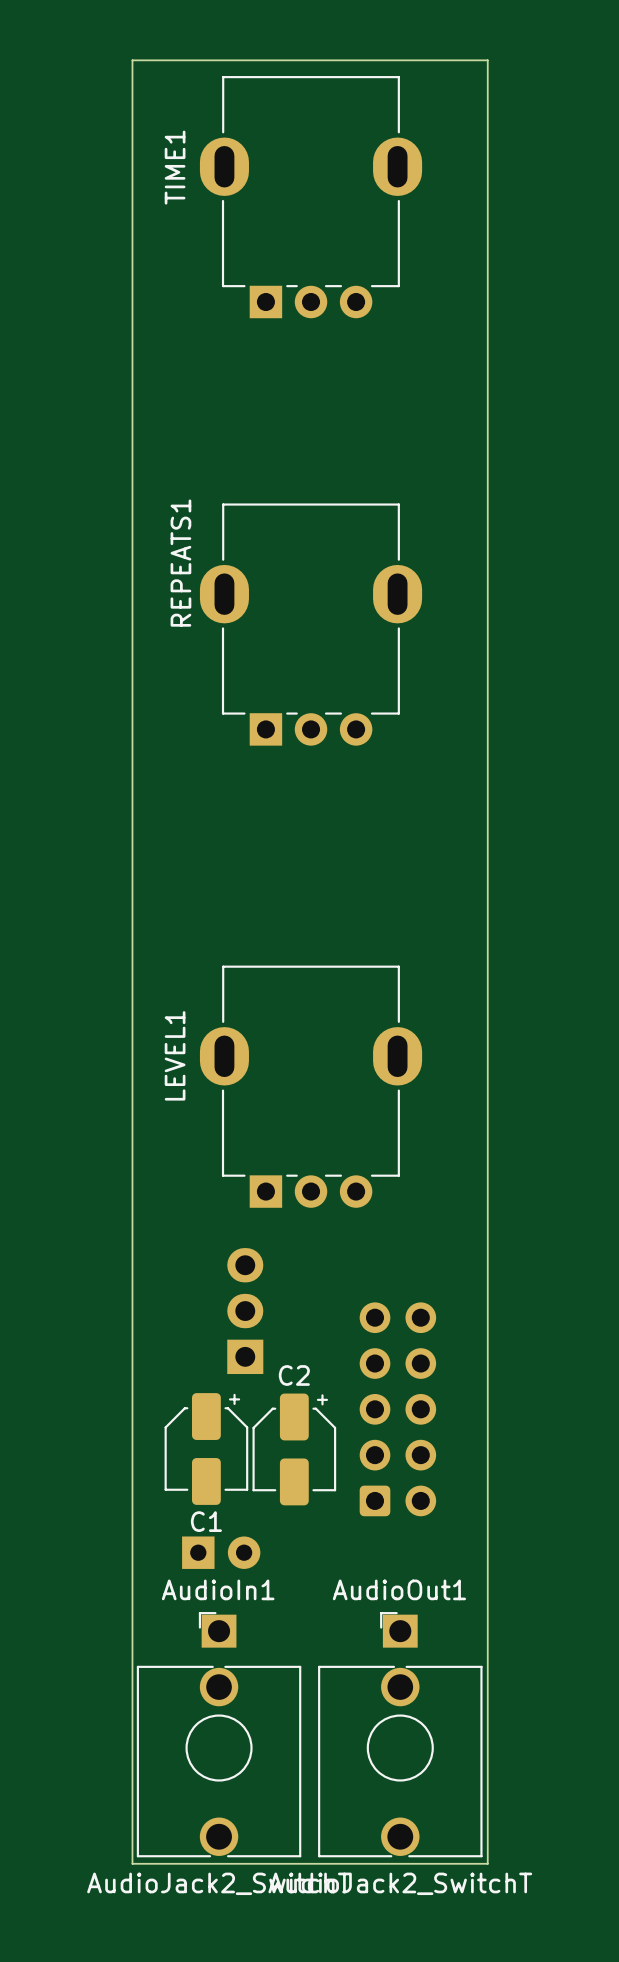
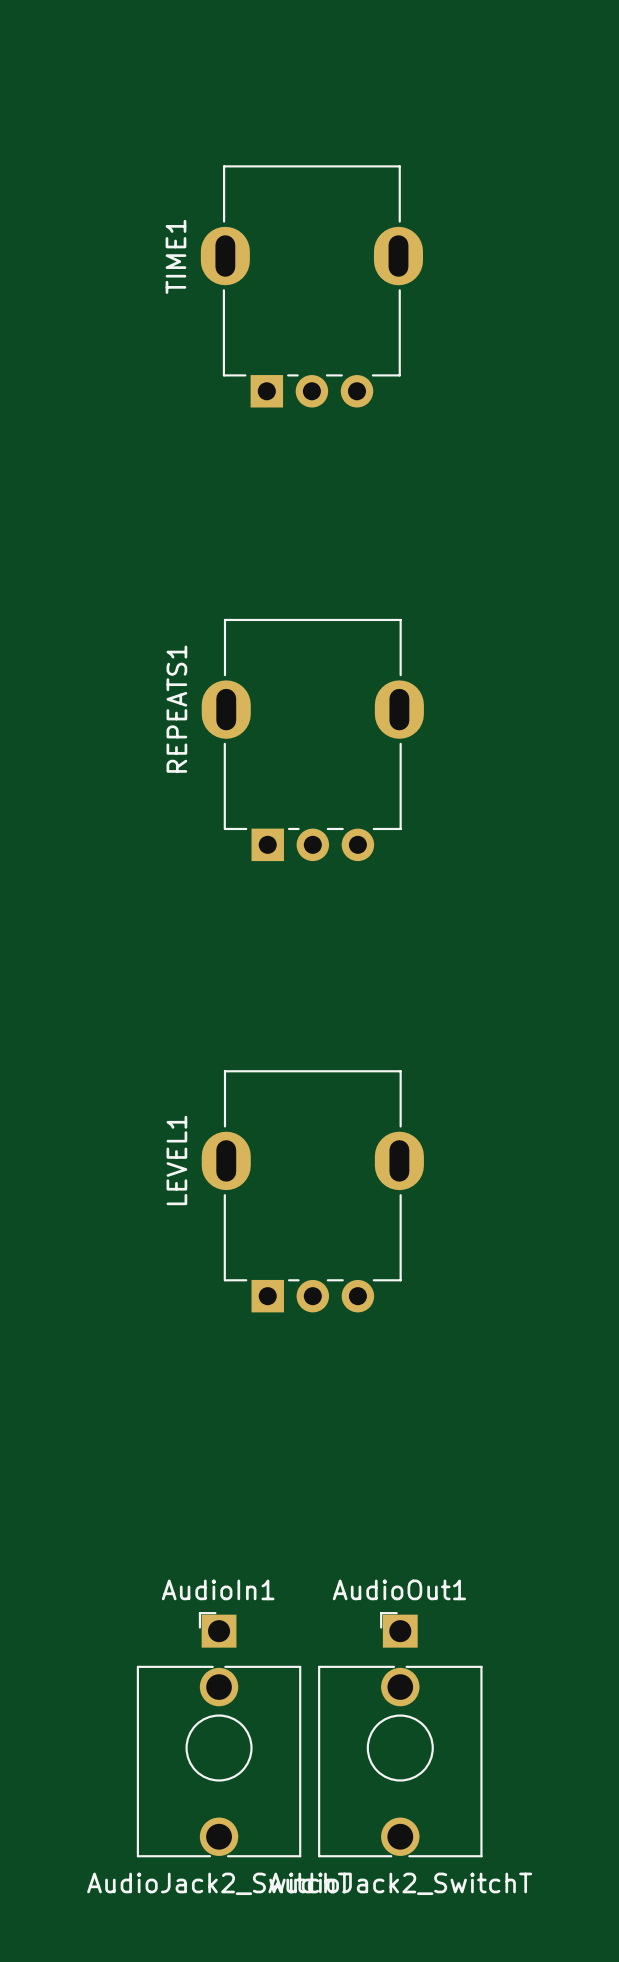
board edge: (132, 60) (132, 1863) (487, 1863) (487, 60) (132, 60) -> none
TIME1 position: (311, 197) -> (311, 286)
REPEATS1 name position: REPEATS1 (180, 563) -> REPEATS1 (176, 709)
REPEATS1 position: (311, 624) -> (312, 739)
LEVEL1 position: (311, 1086) -> (312, 1191)
part: (245, 1311) -> none
part: (397, 1409) -> none
C1: (206, 1449) -> none
C2: (294, 1449) -> none
part: (221, 1552) -> none

